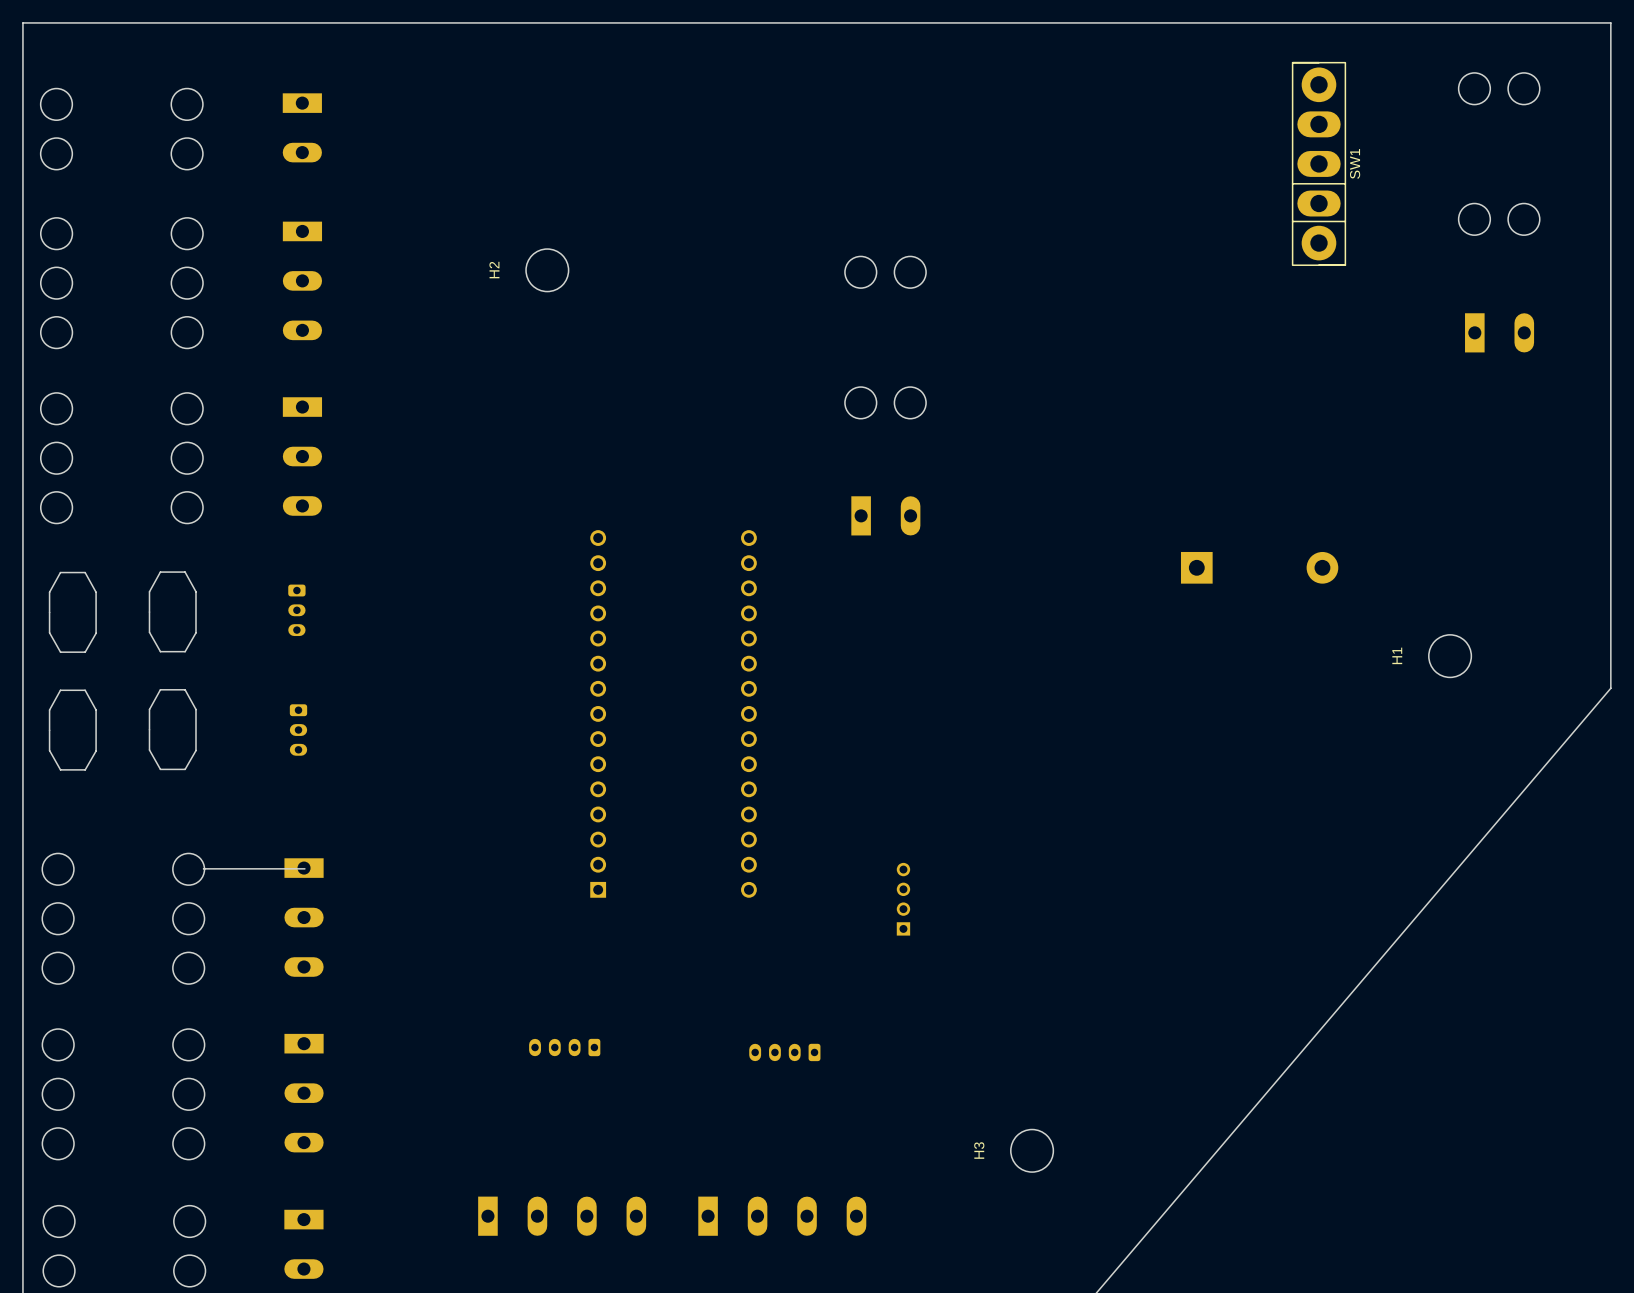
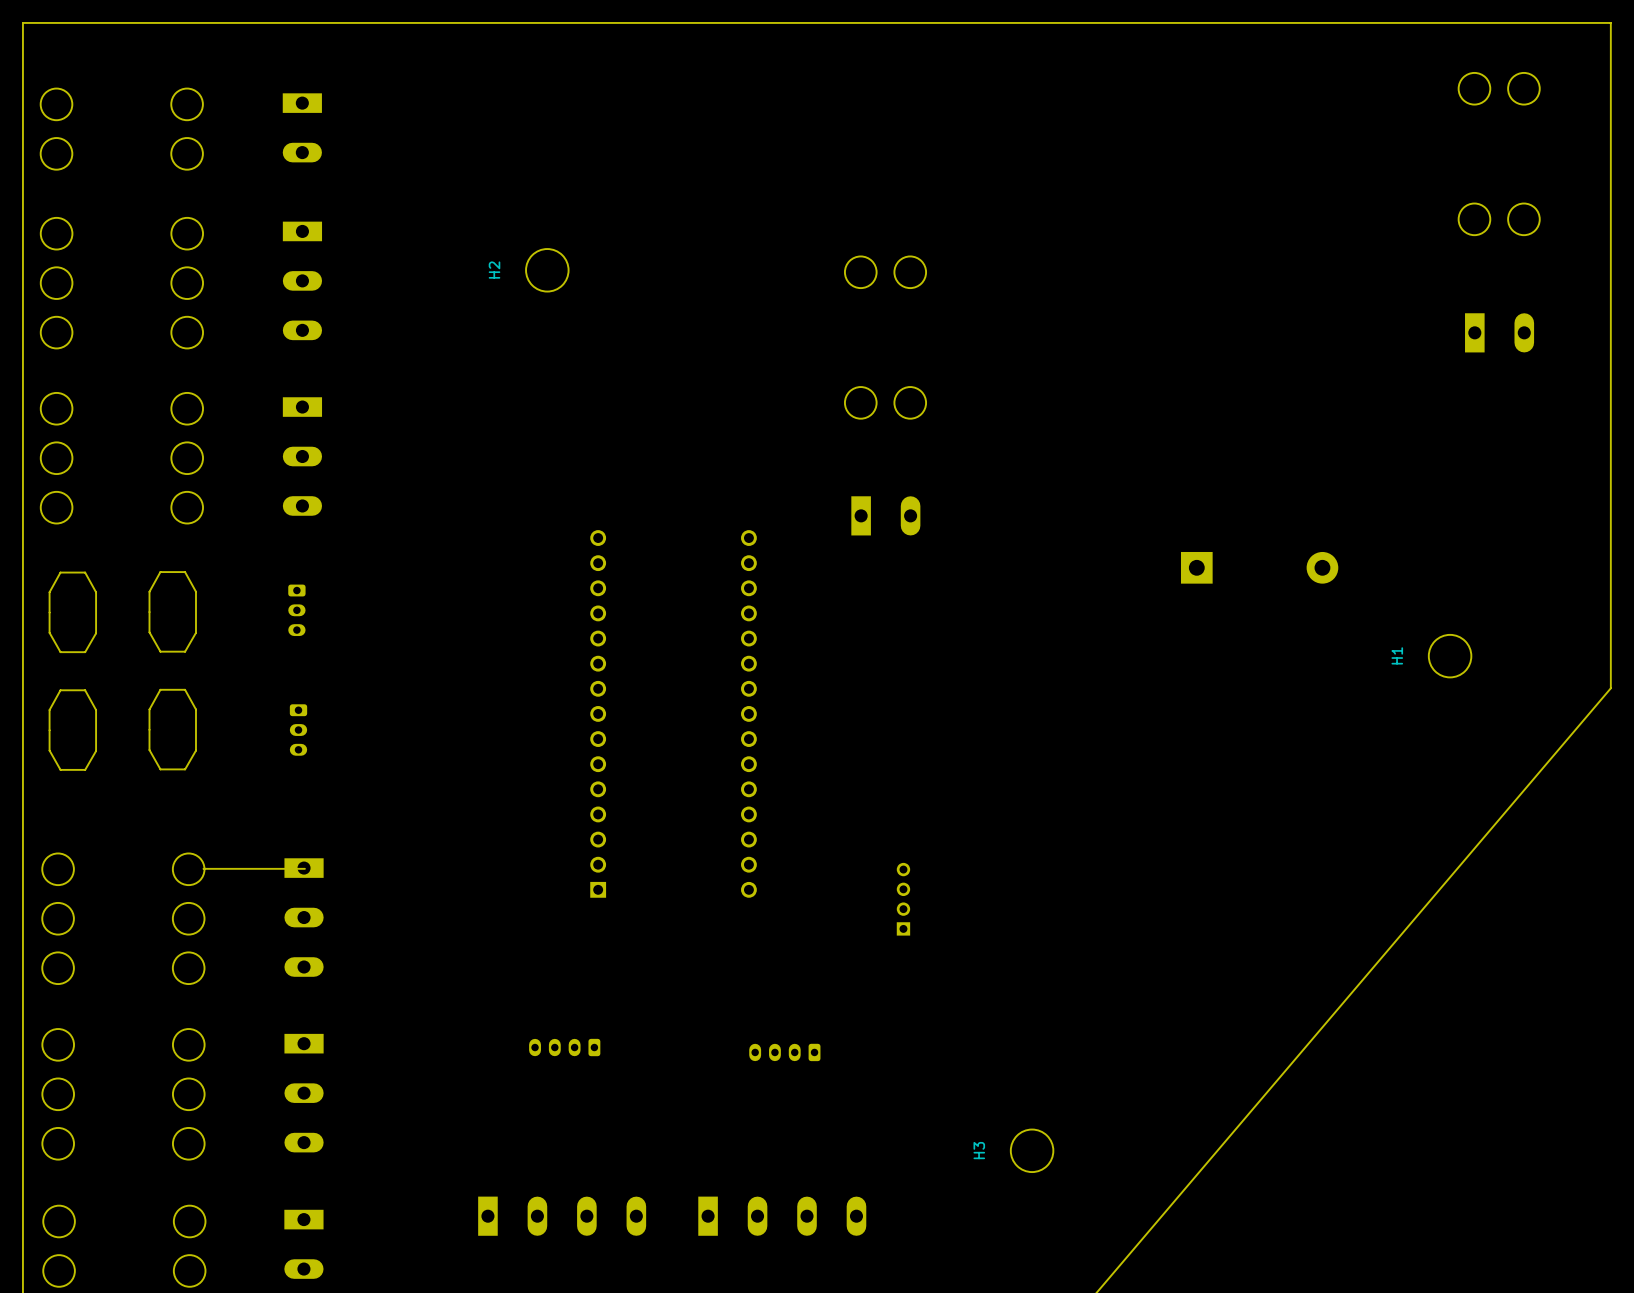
SW1: (1318, 163) -> none

